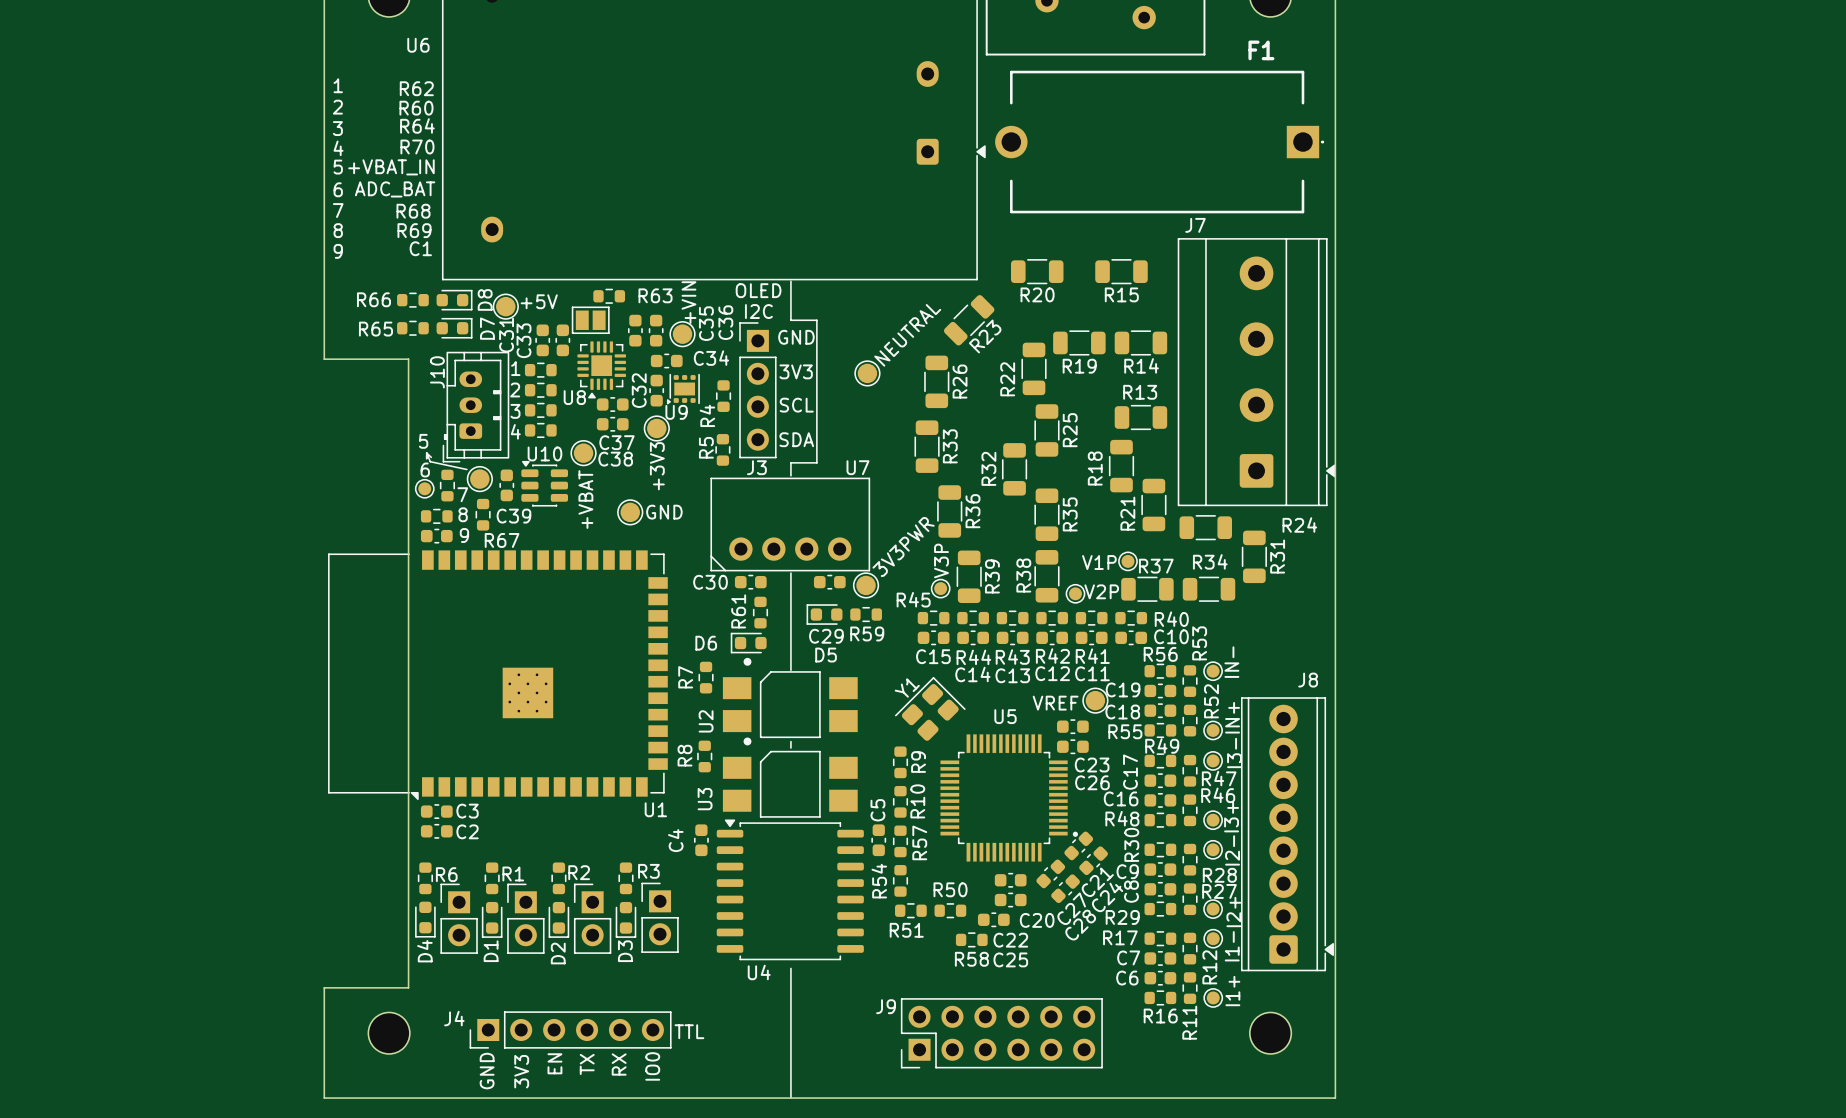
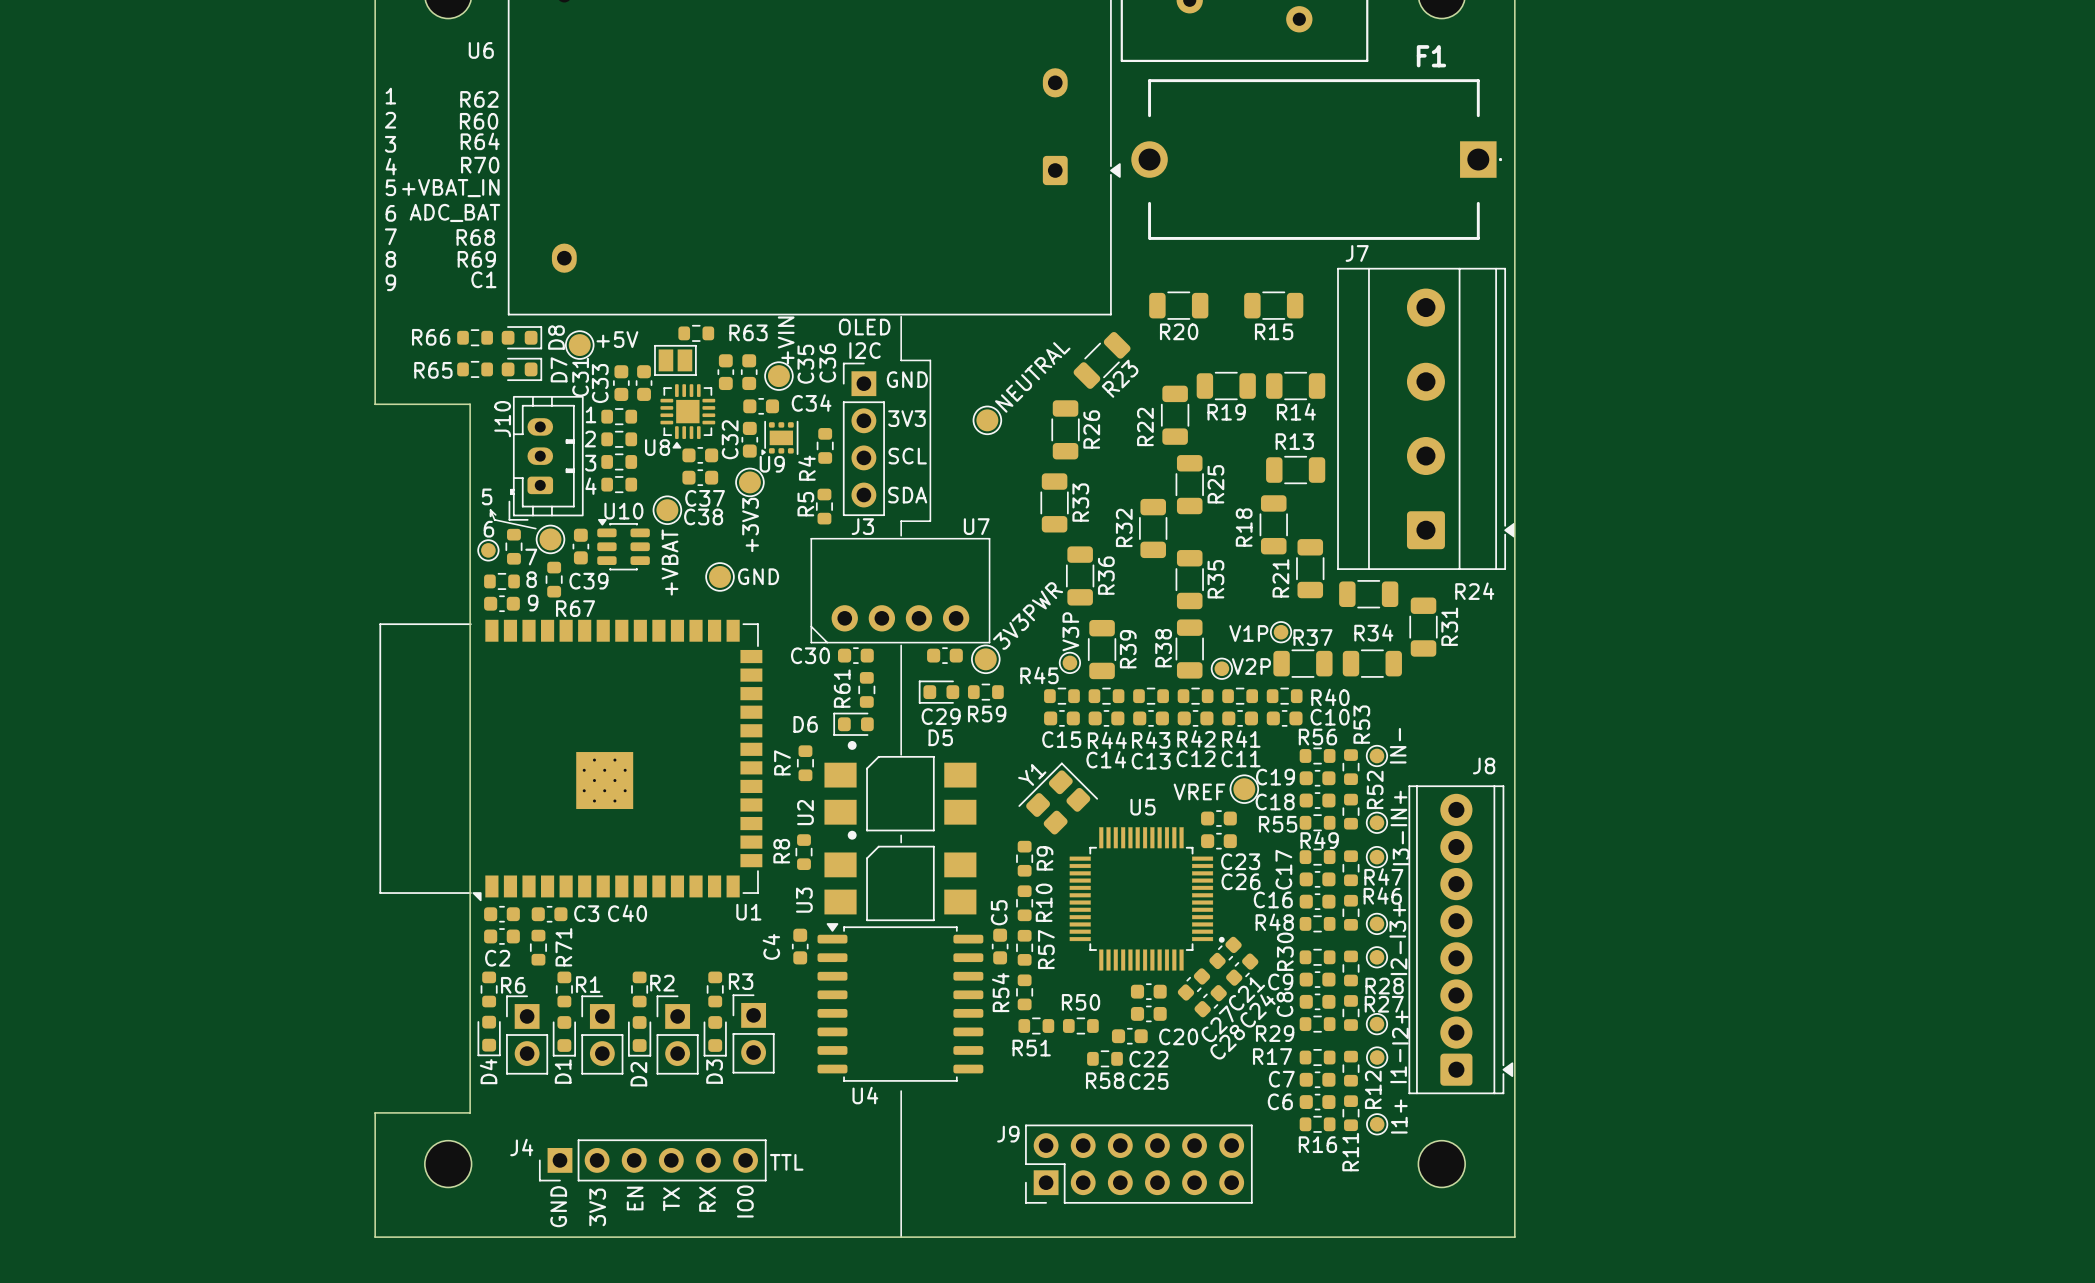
C3 name position: C3 (467, 811) -> C3 (586, 913)
C40: none -> (549, 914)
C2 name position: C2 (467, 831) -> C2 (497, 958)
R71: none -> (538, 947)

